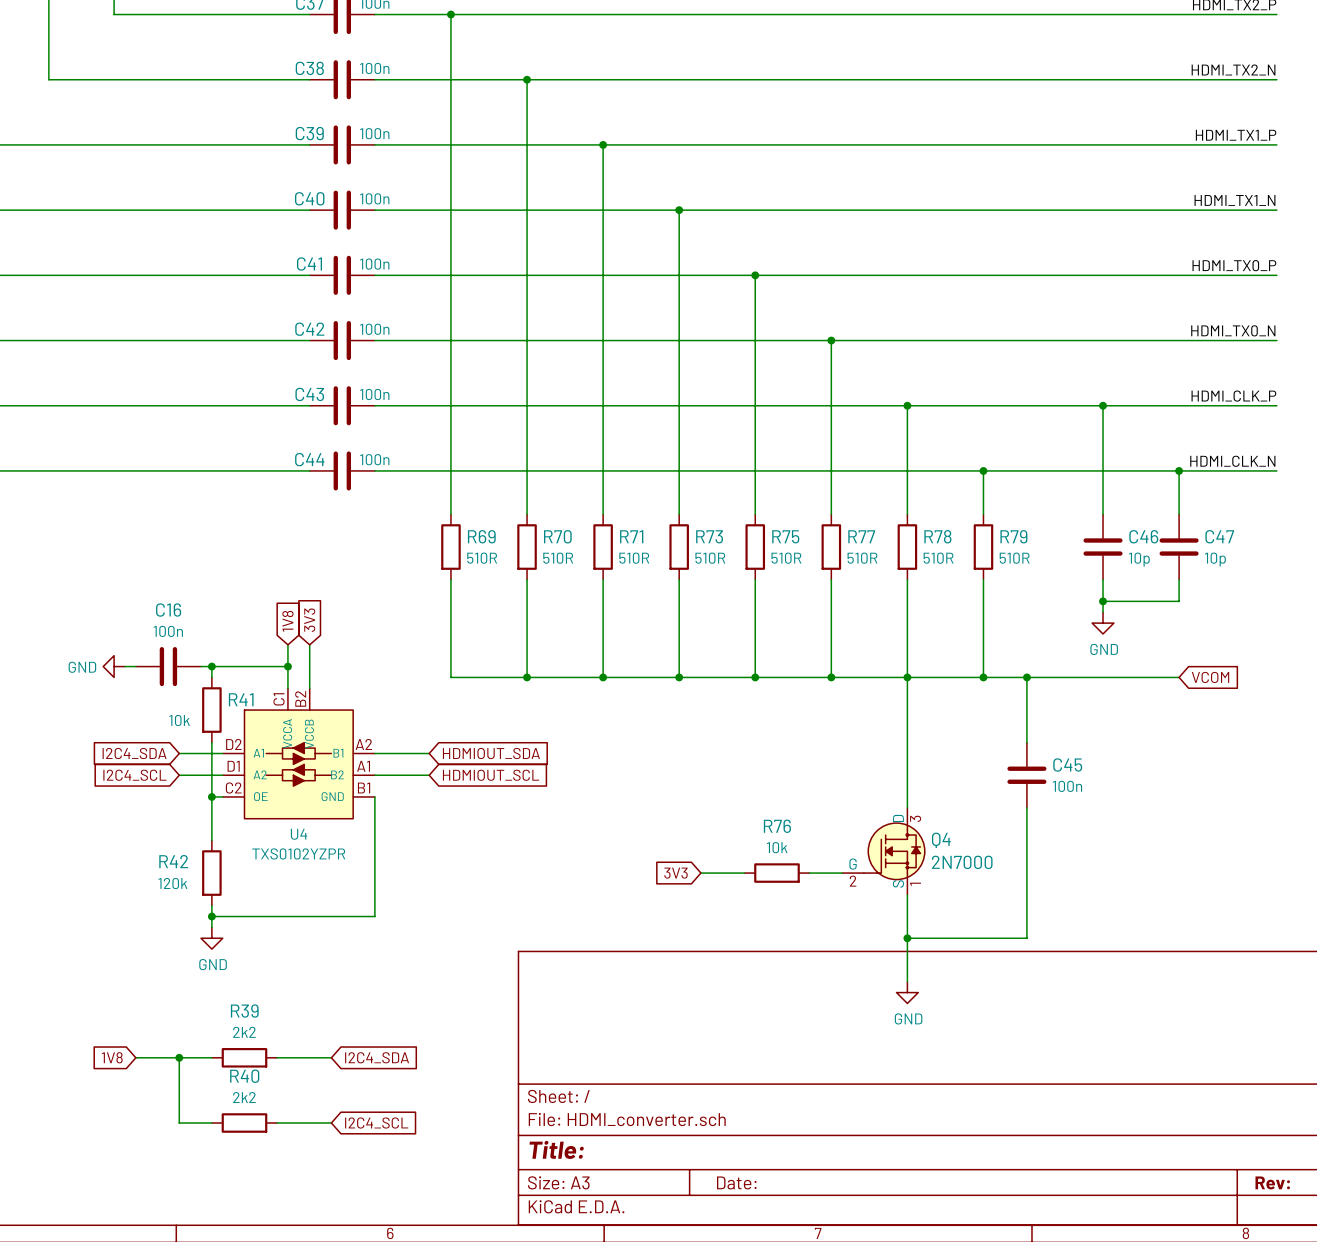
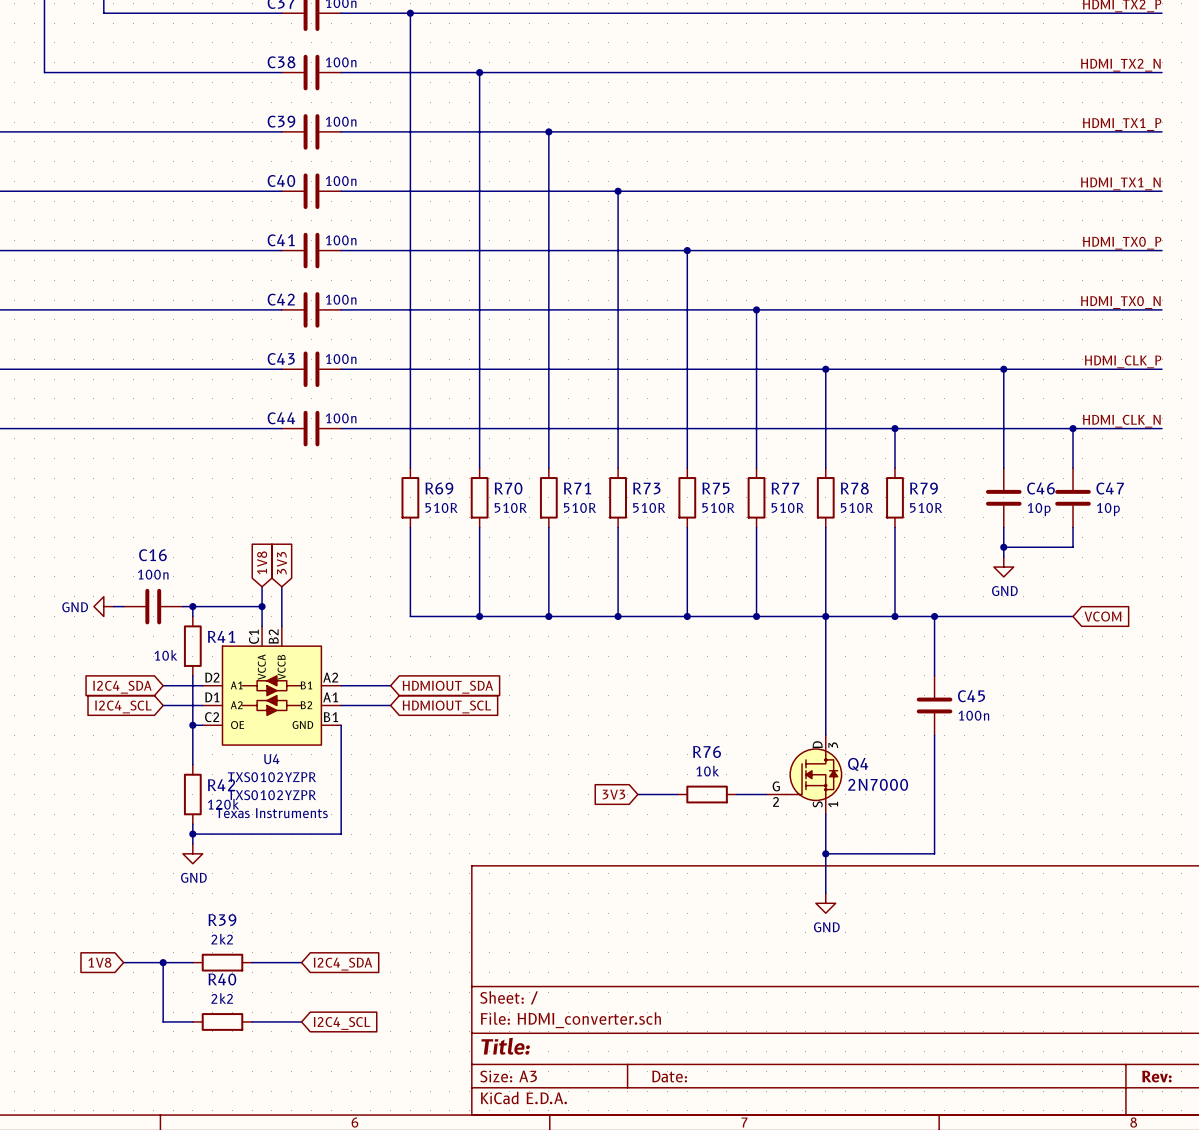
R42 name position: R42 (173, 861) -> R42 (221, 785)
U4 text: none -> TXS0102YZPR (271, 795)
R42 text position: 120k (172, 883) -> 120k (223, 804)
U4 text: none -> Texas Instruments (271, 813)

